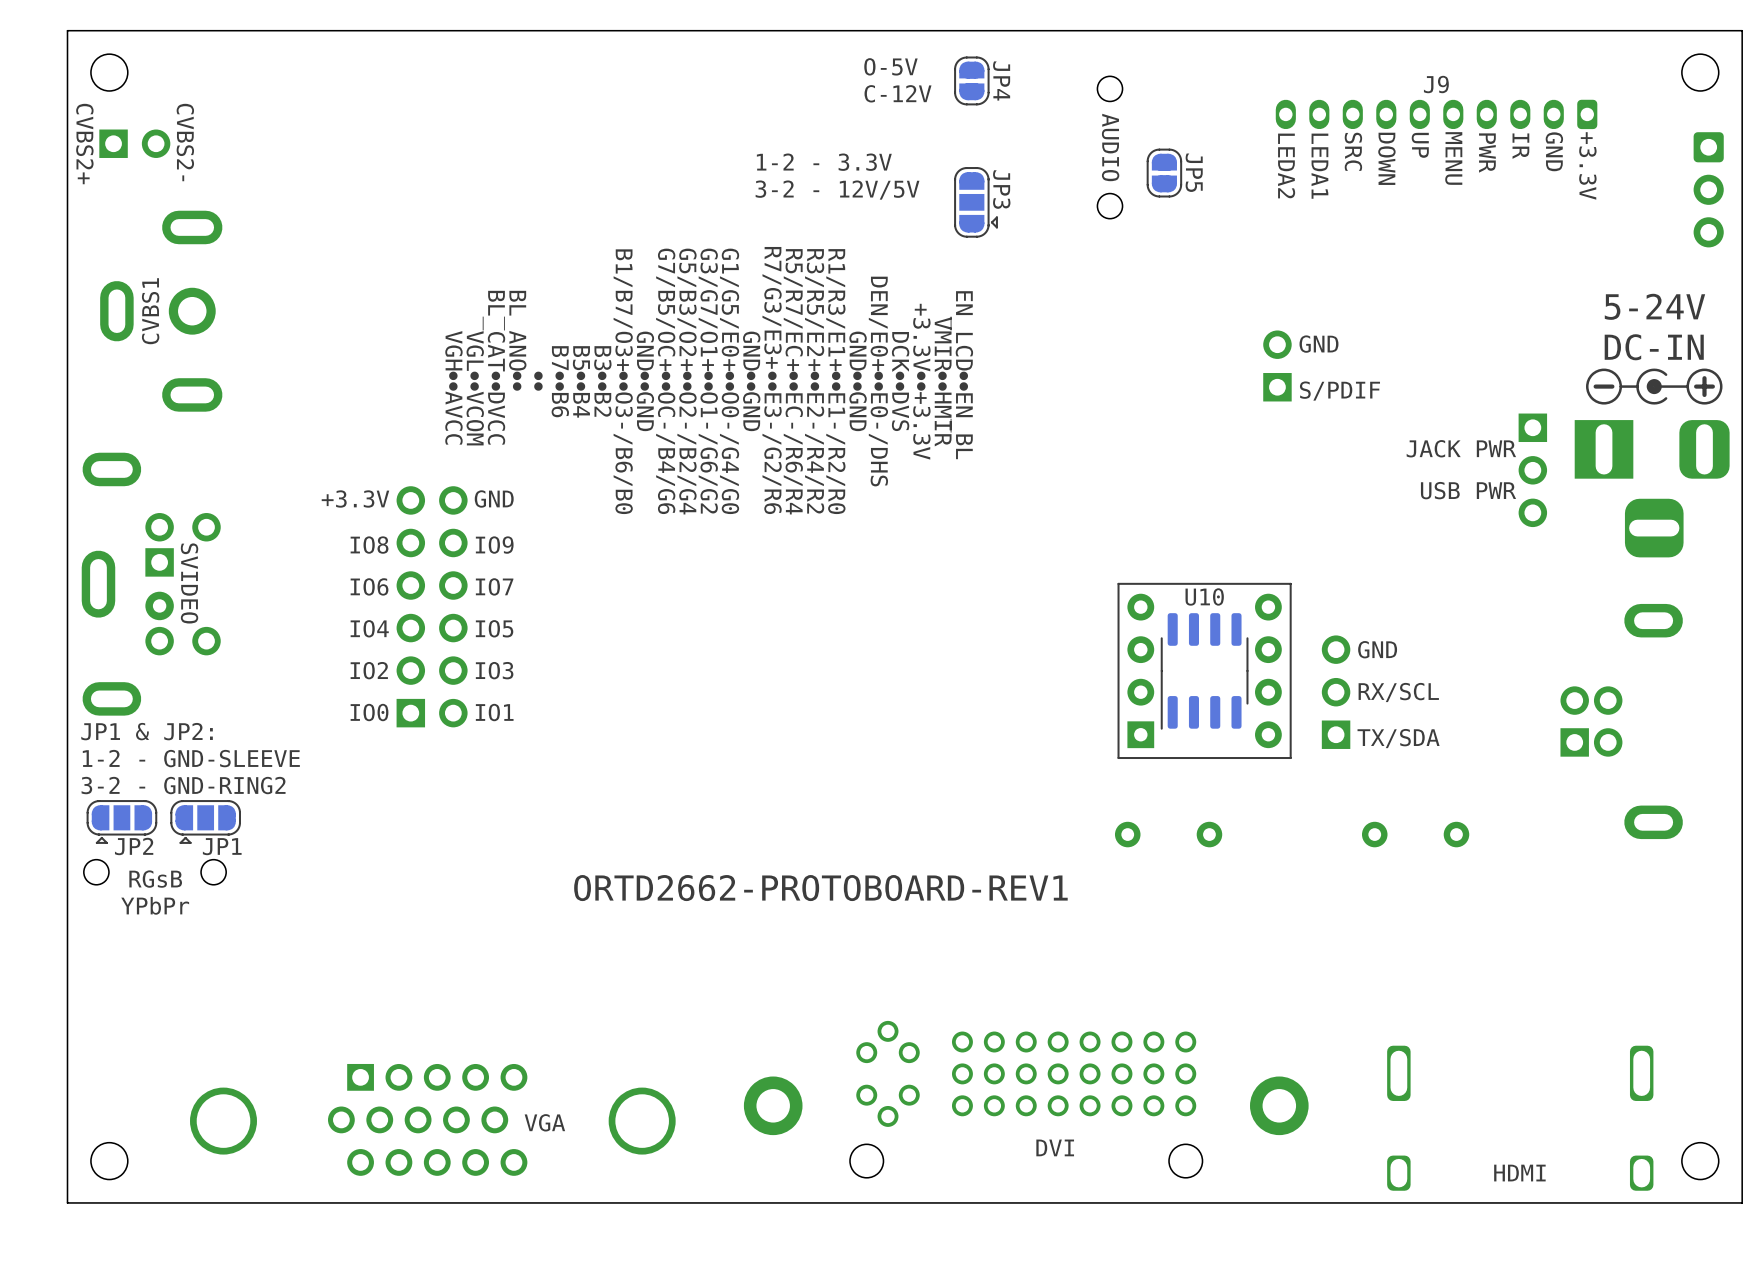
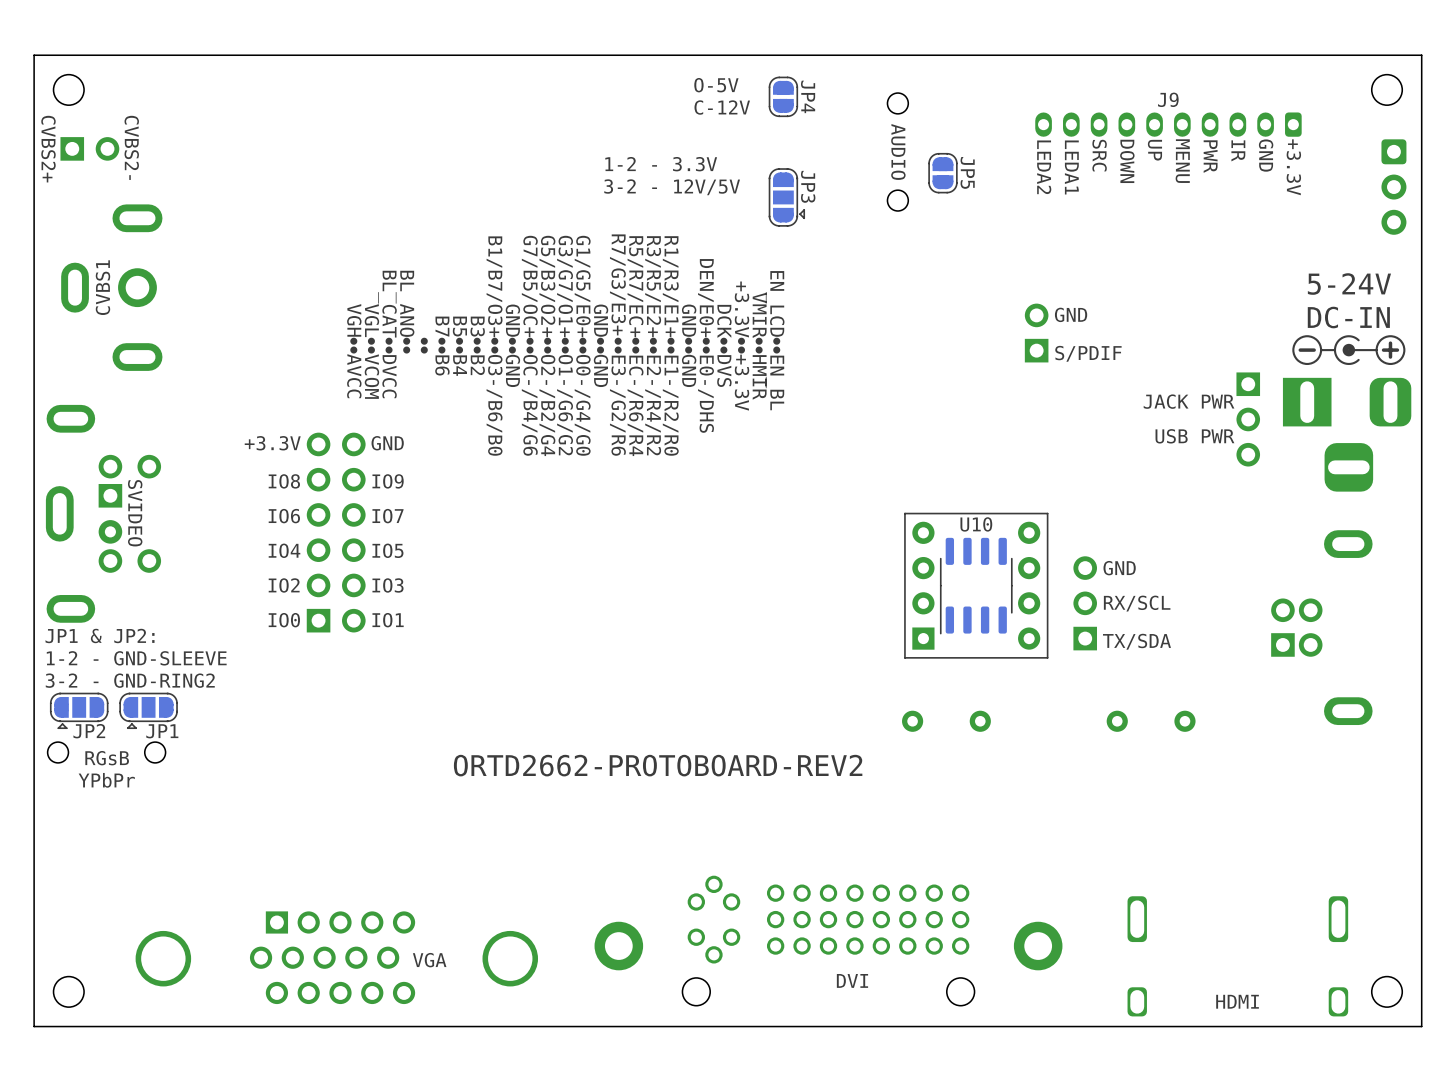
text: ORTD2662-PROTOBOARD-REV1 (820, 888) -> ORTD2662-PROTOBOARD-REV2 (658, 765)

